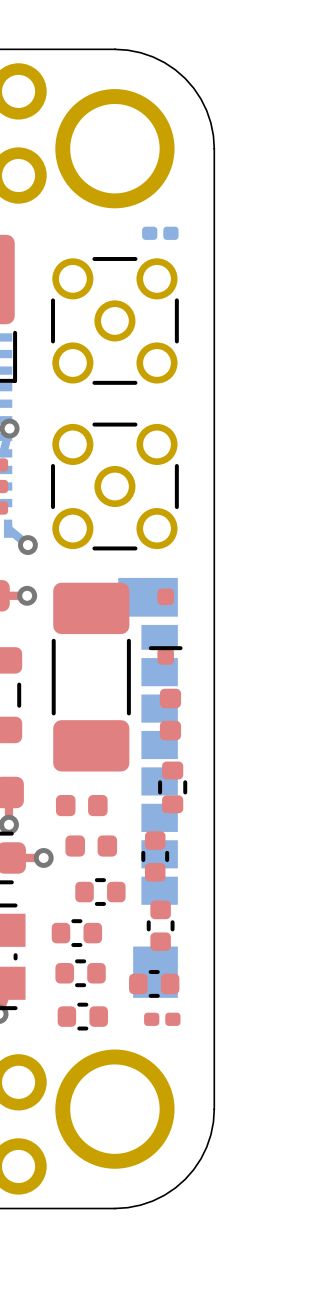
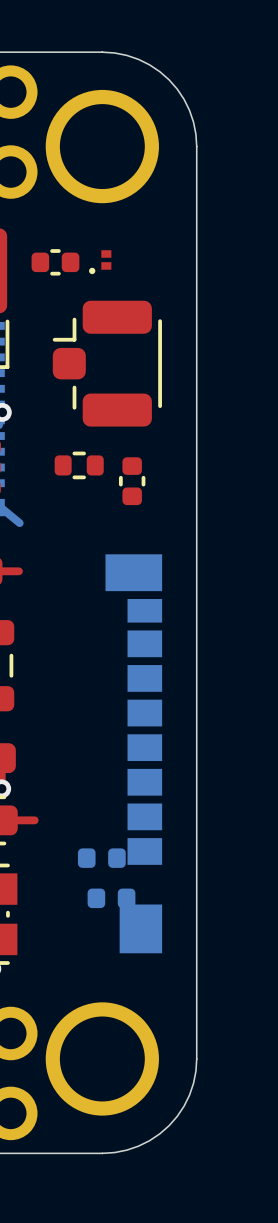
part: (160, 233) -> none
part: none -> (55, 262)
part: none -> (100, 262)
part: (114, 320) -> none
part: none -> (107, 363)
part: (114, 486) -> none
part: none -> (132, 481)
via: (27, 545) -> none
via: (27, 595) -> none
part: (165, 626) -> none
part: (91, 677) -> none
part: (170, 714) -> none
part rotation: 0° (172, 787) -> 90° clockwise (79, 465)
part position: (172, 787) -> (79, 465)
part: (81, 805) -> none
part: (91, 846) -> none
part: (155, 856) -> none
via: (43, 857) -> none
part side: top (100, 892) -> bottom (101, 858)
part: (160, 925) -> none
part: (76, 933) -> none
part: none -> (111, 898)
part: (80, 973) -> none
part: (154, 983) -> none
part: (82, 1016) -> none
part: (162, 1019) -> none

